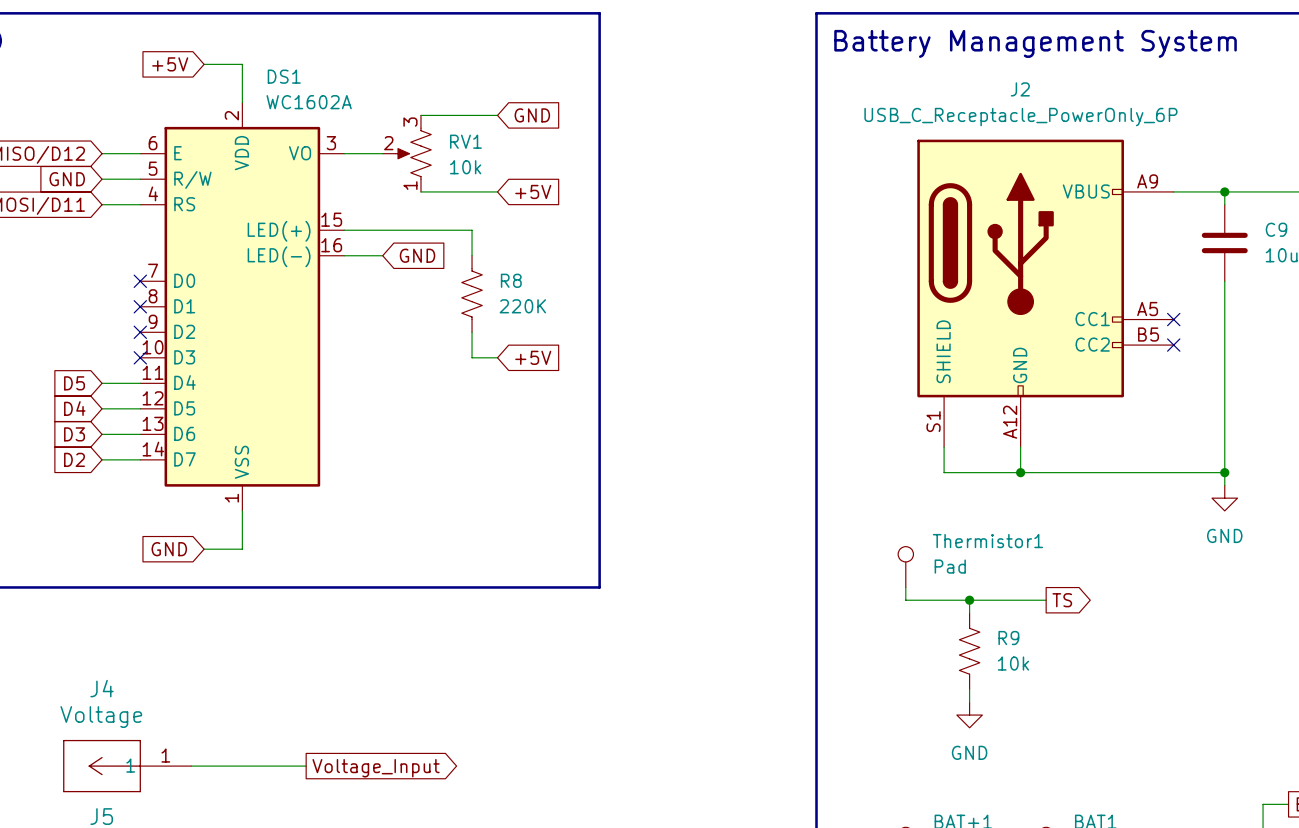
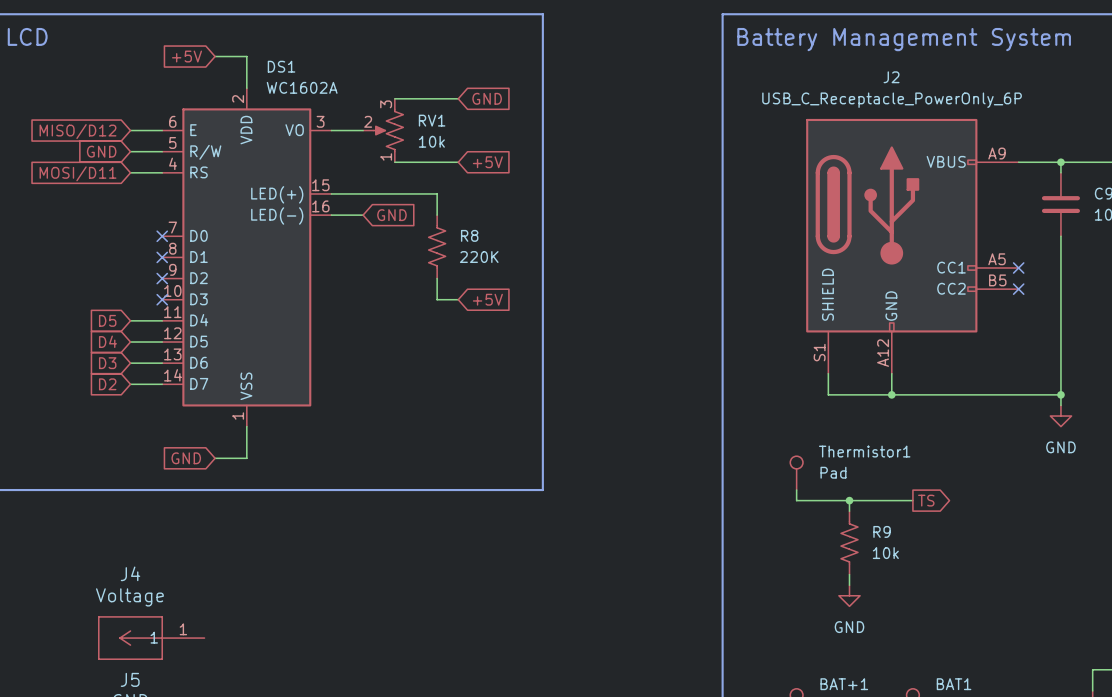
wire: (191, 766) (306, 766) -> none
global label: Voltage_Input (376, 768) -> none

